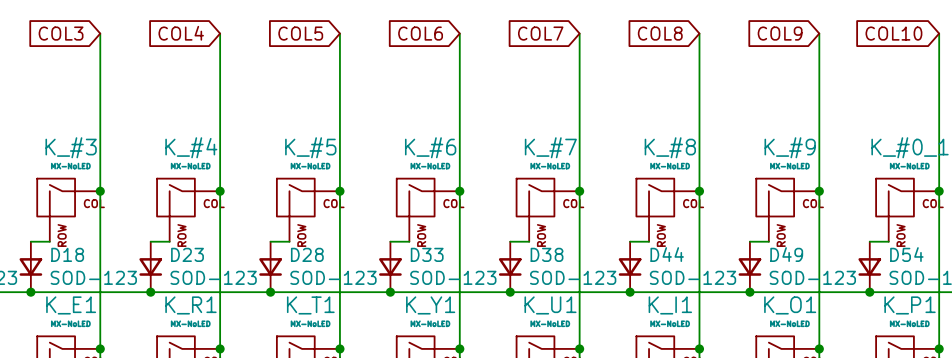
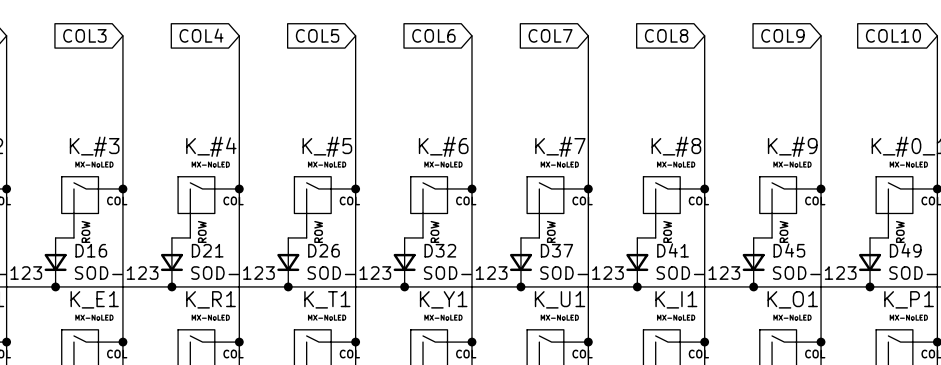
D18 name: D18 (67, 254) -> D16 (91, 250)
D23 name: D23 (187, 254) -> D21 (207, 250)
D28 name: D28 (307, 254) -> D26 (323, 250)
D33 name: D33 (427, 254) -> D32 (440, 250)
D38 name: D38 (547, 254) -> D37 (556, 250)
D44 name: D44 (667, 254) -> D41 (673, 250)
D49 name: D49 (786, 254) -> D45 (789, 250)
D54 name: D54 (906, 254) -> D49 (905, 250)

